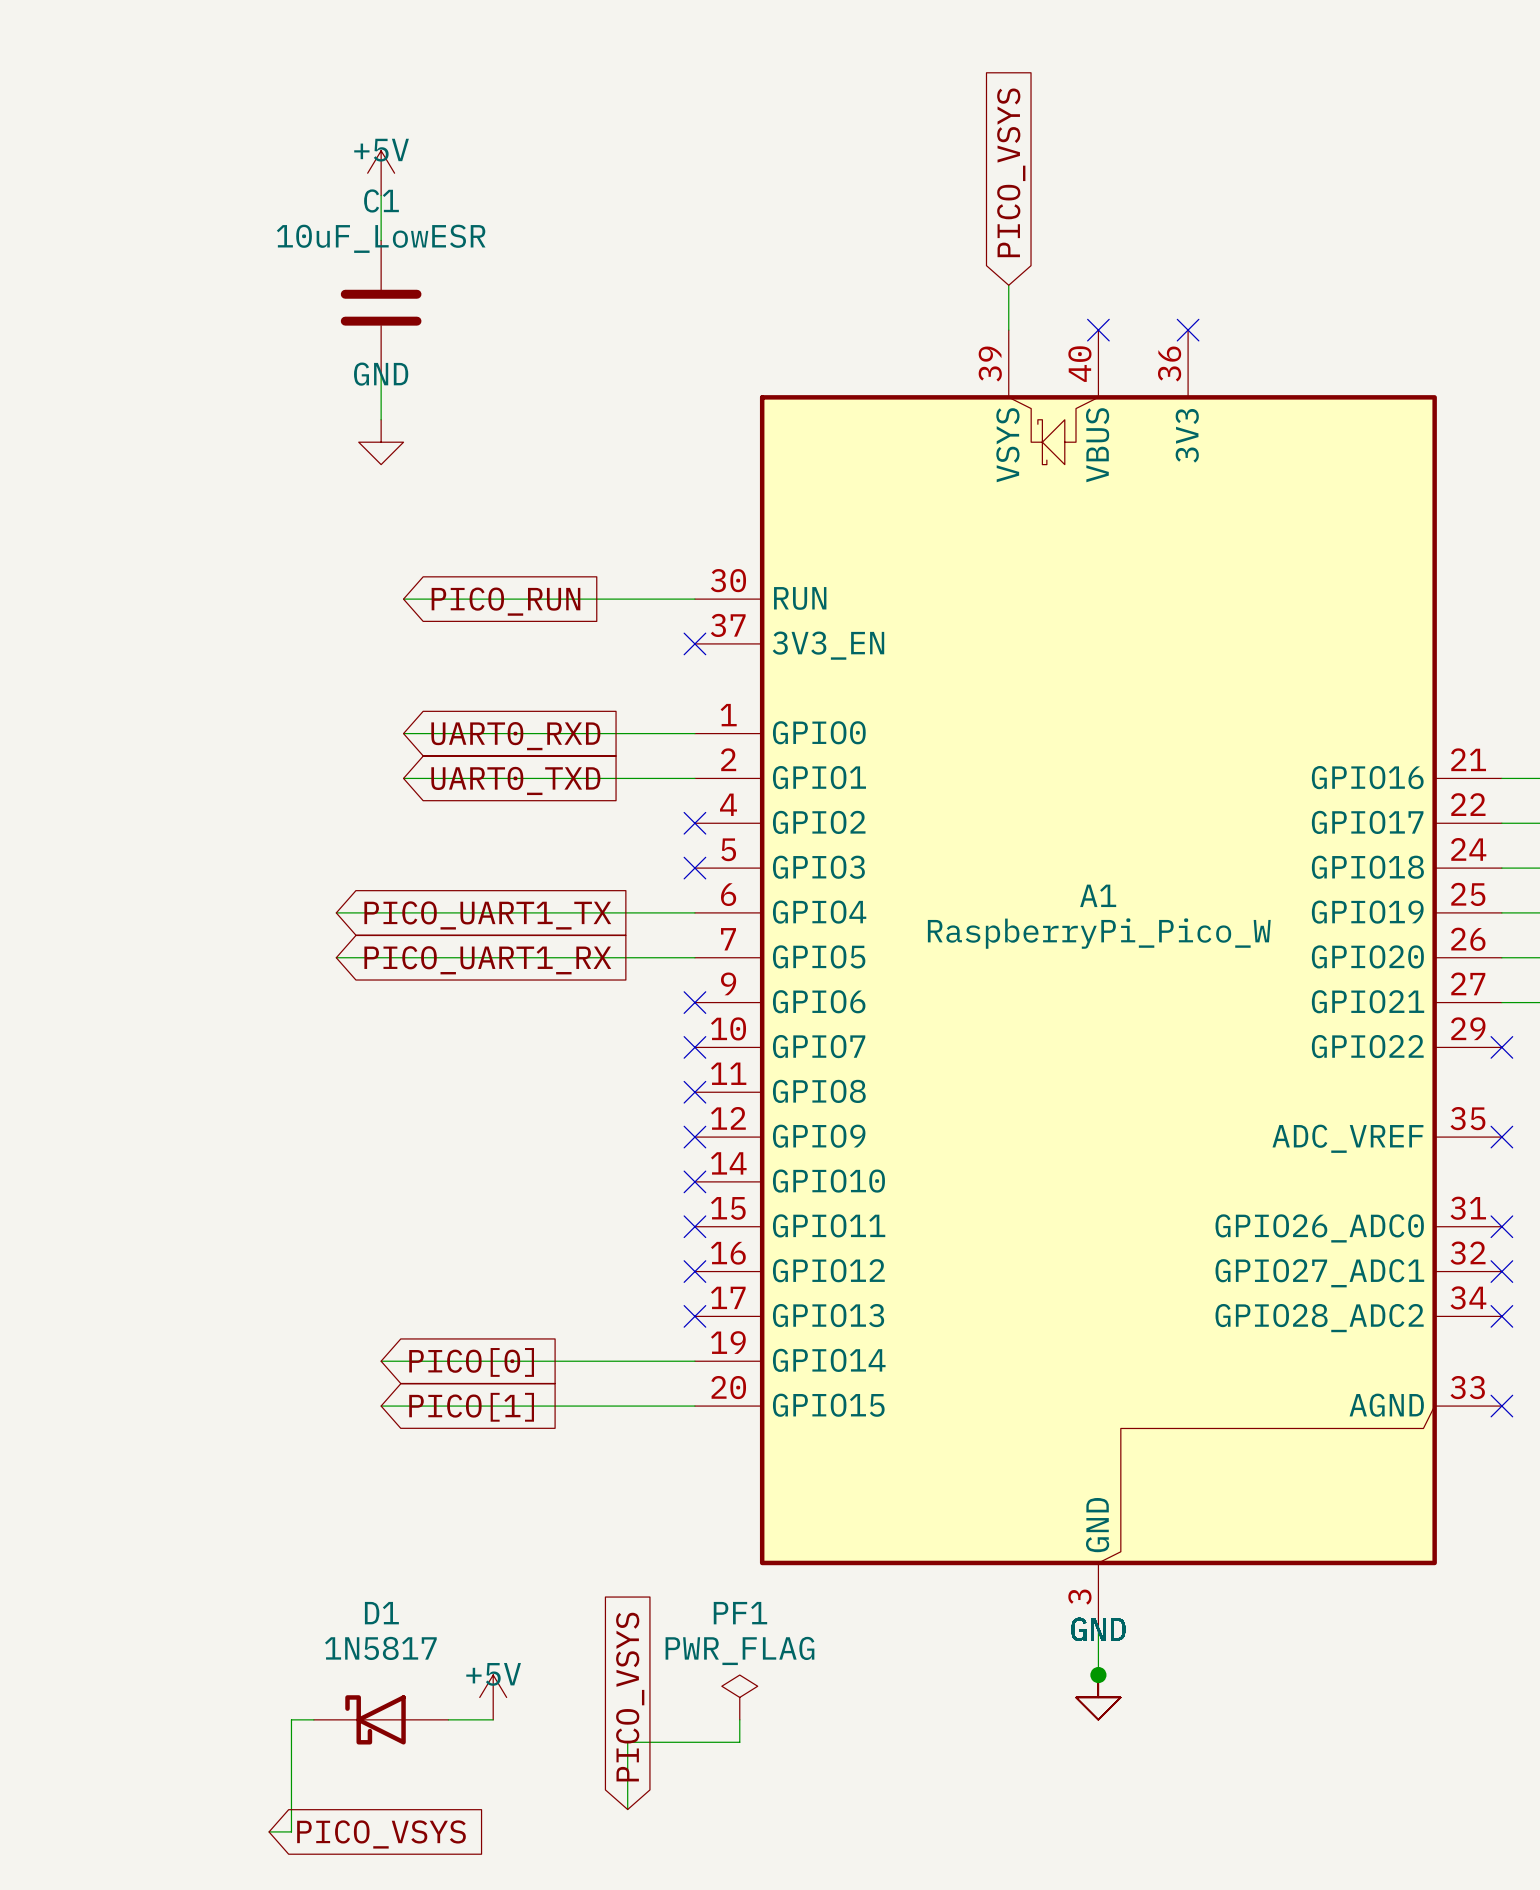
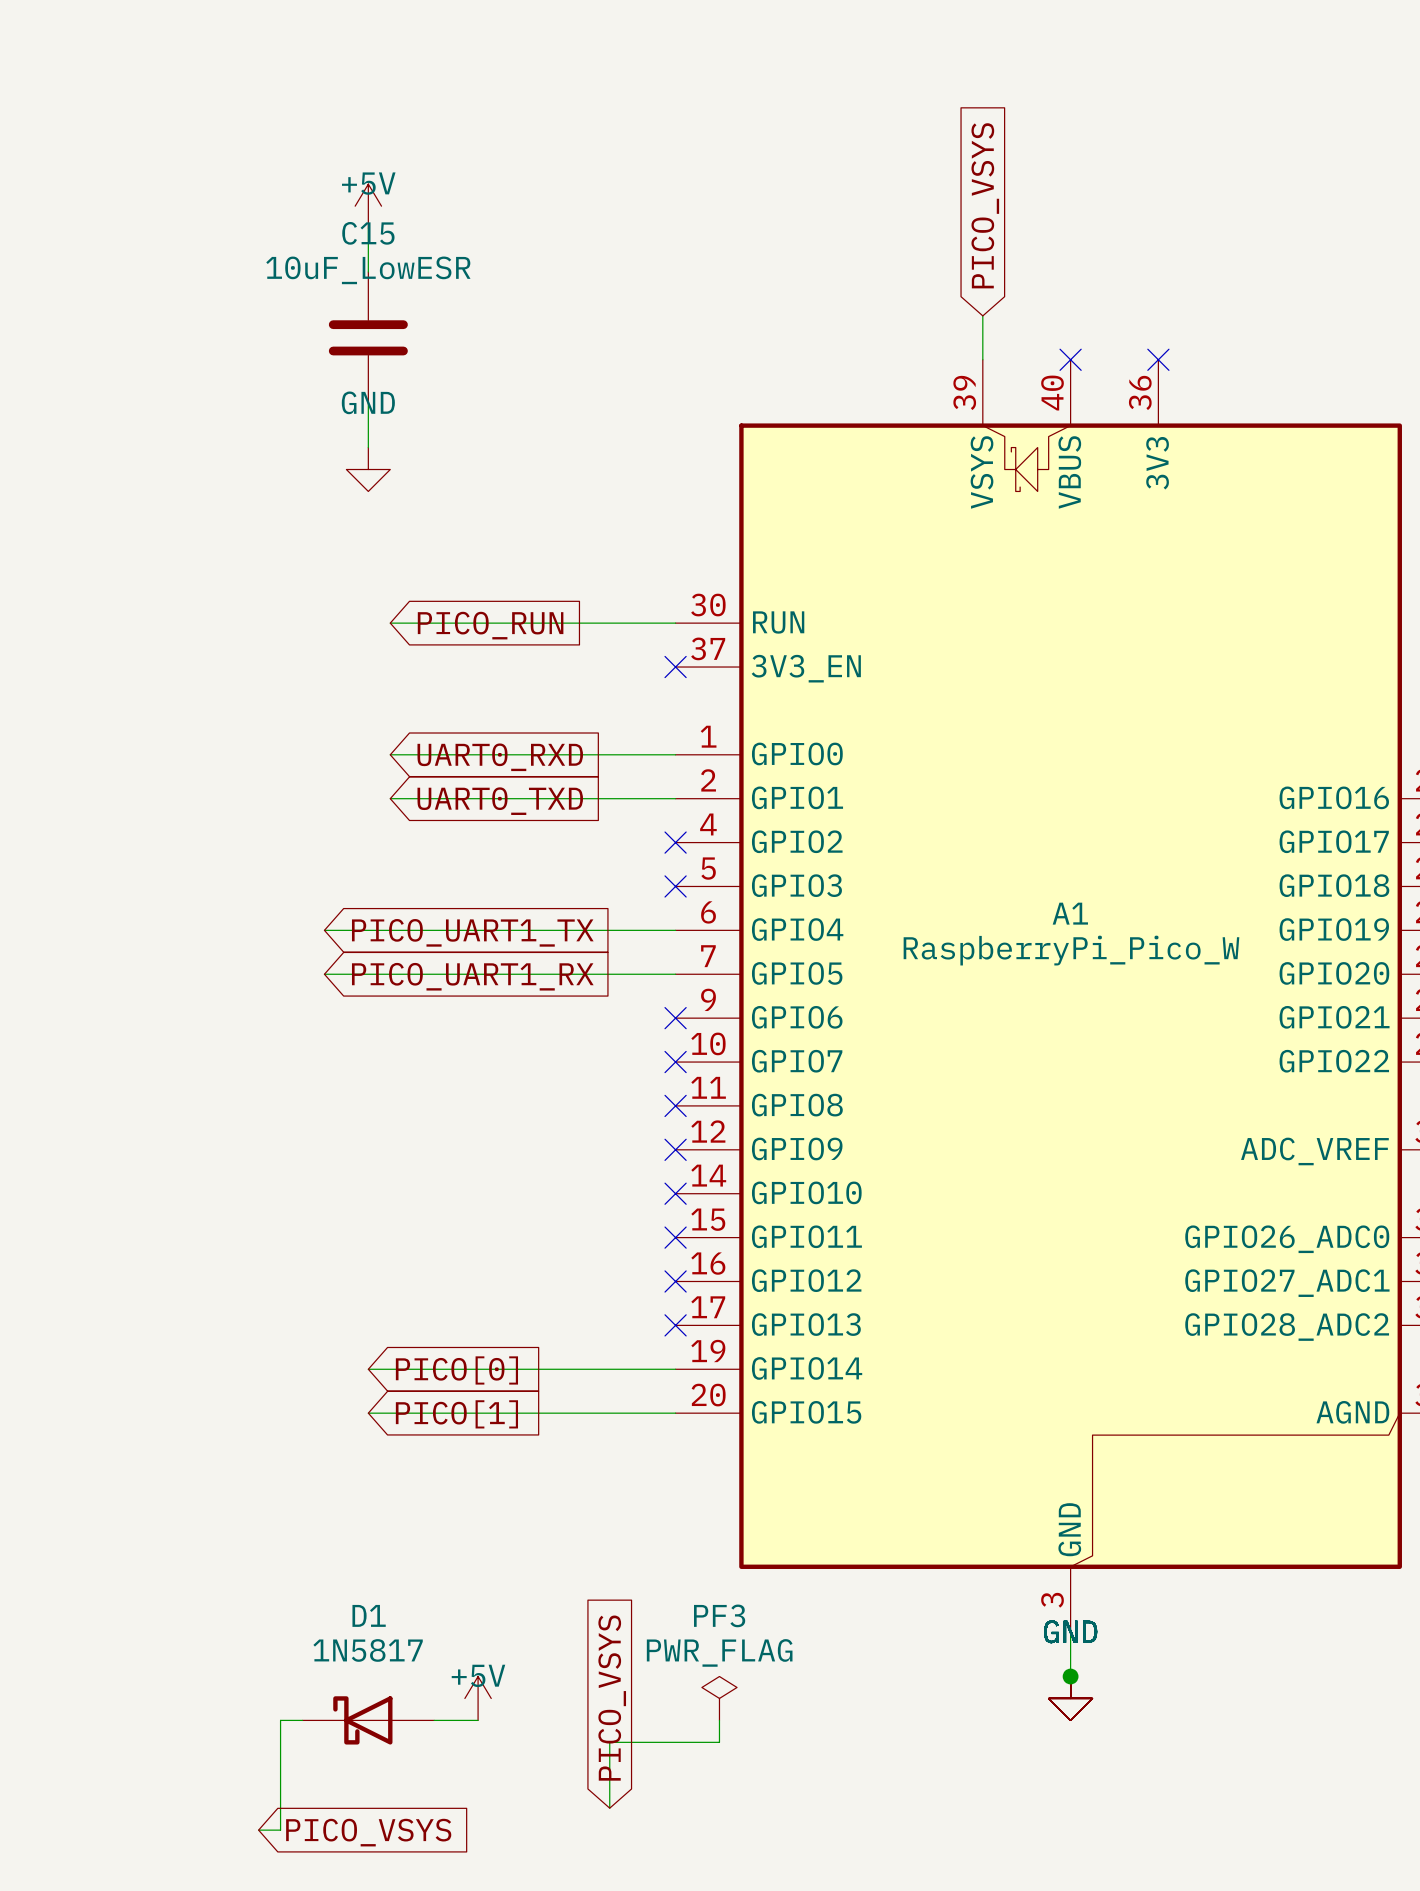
C1 name: C1 (381, 200) -> C15 (368, 233)
PF1 name: PF1 (740, 1613) -> PF3 (719, 1615)

